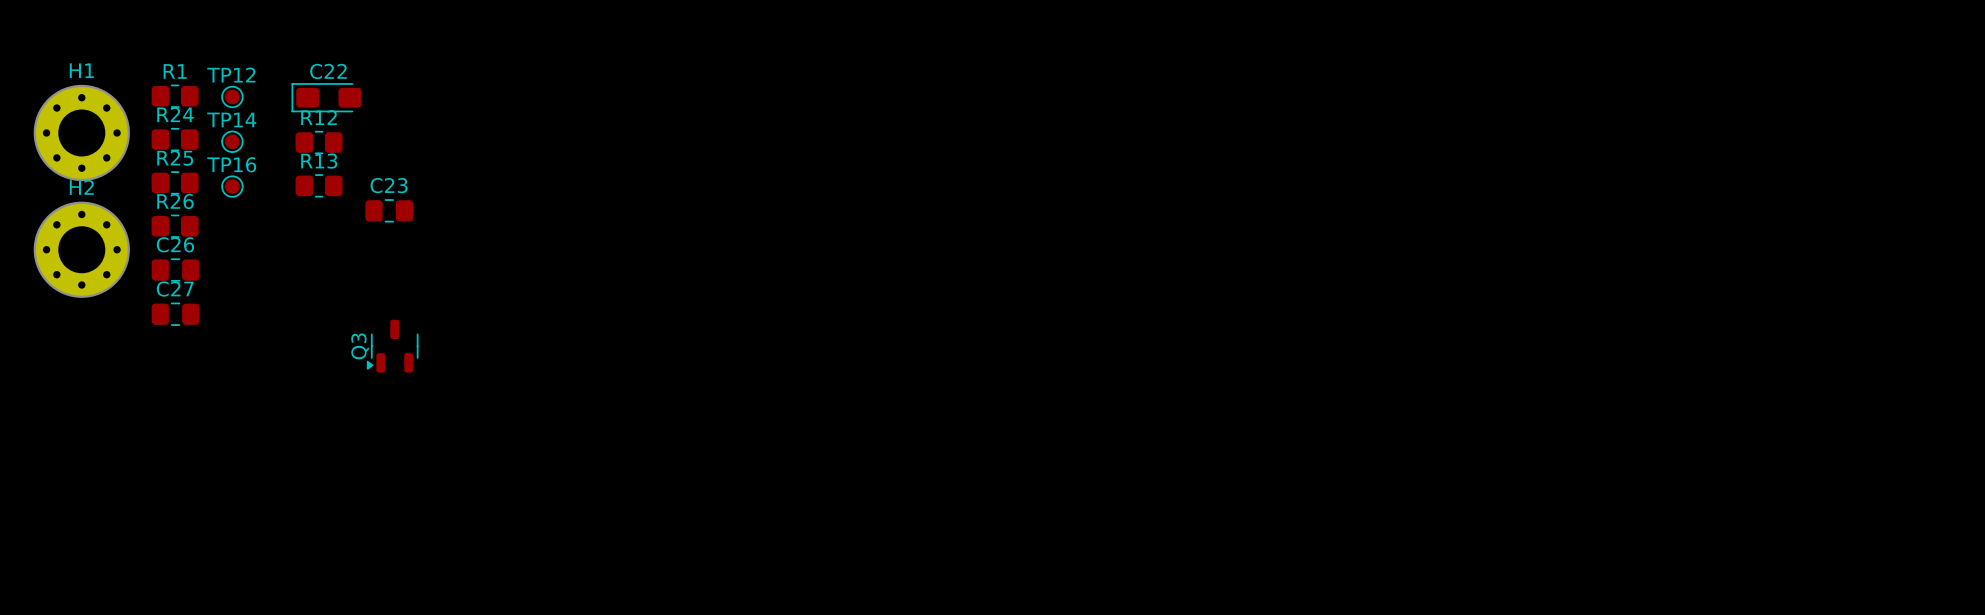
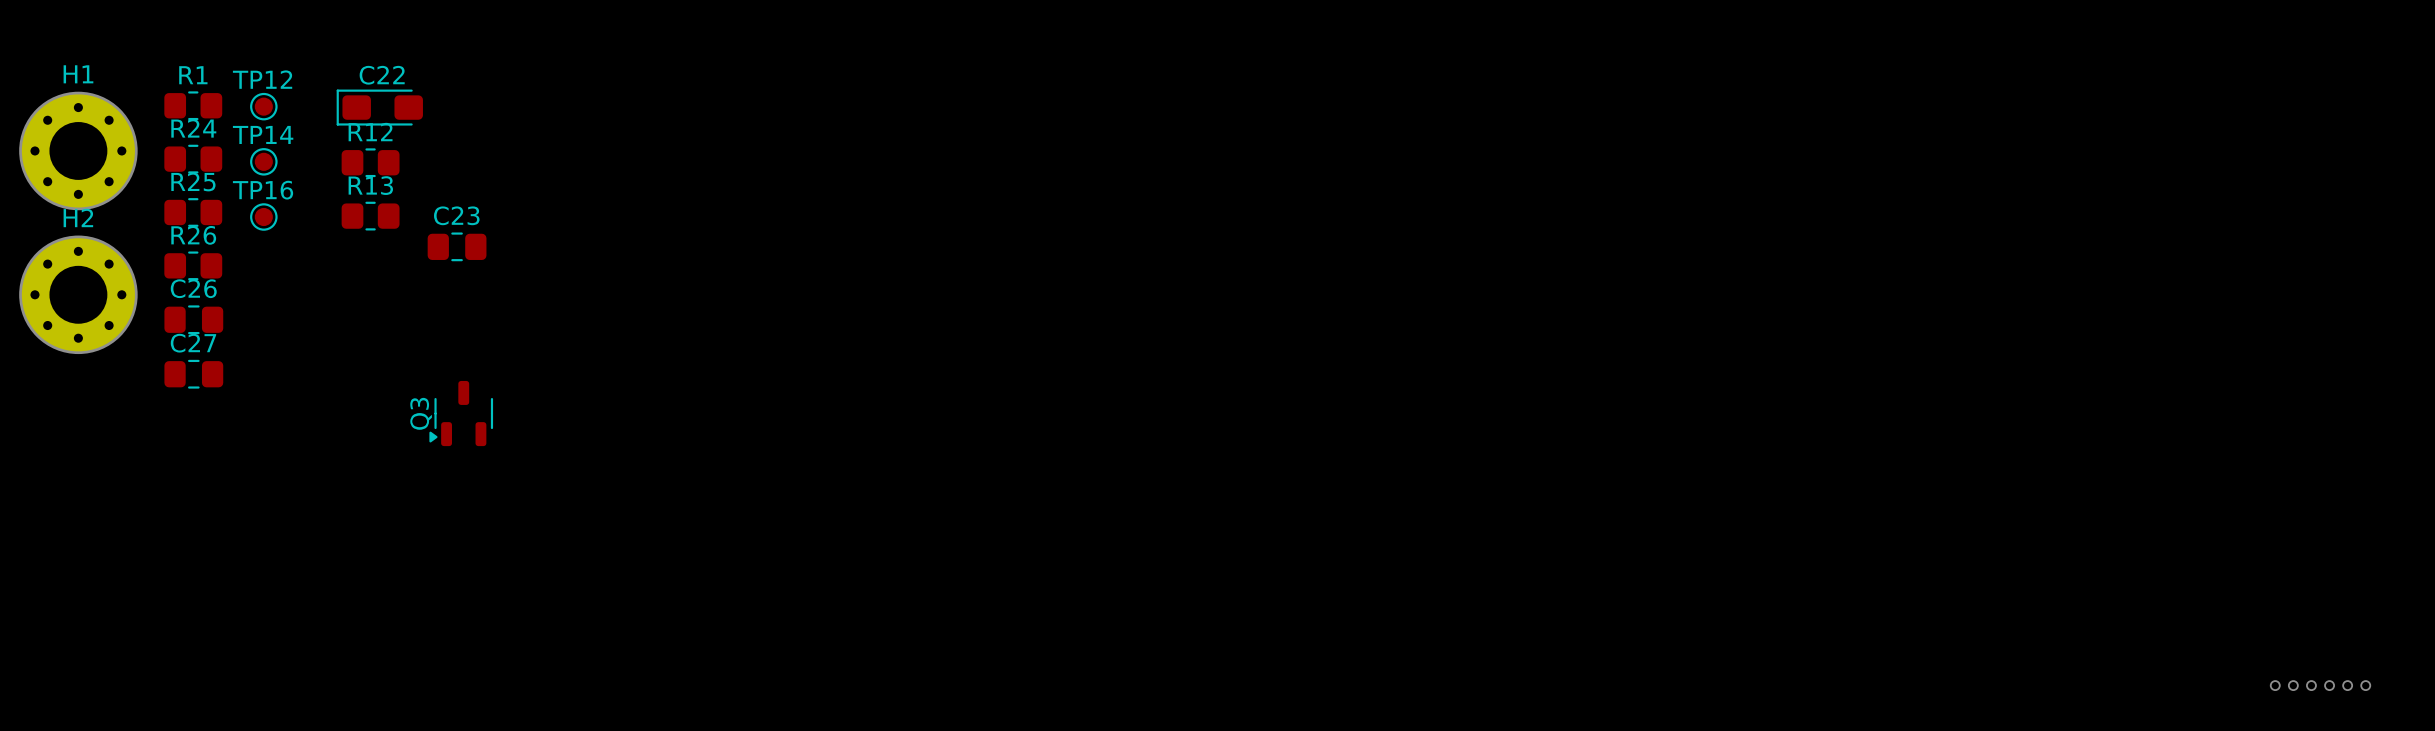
drawing: none -> [2269, 680, 2372, 692]

